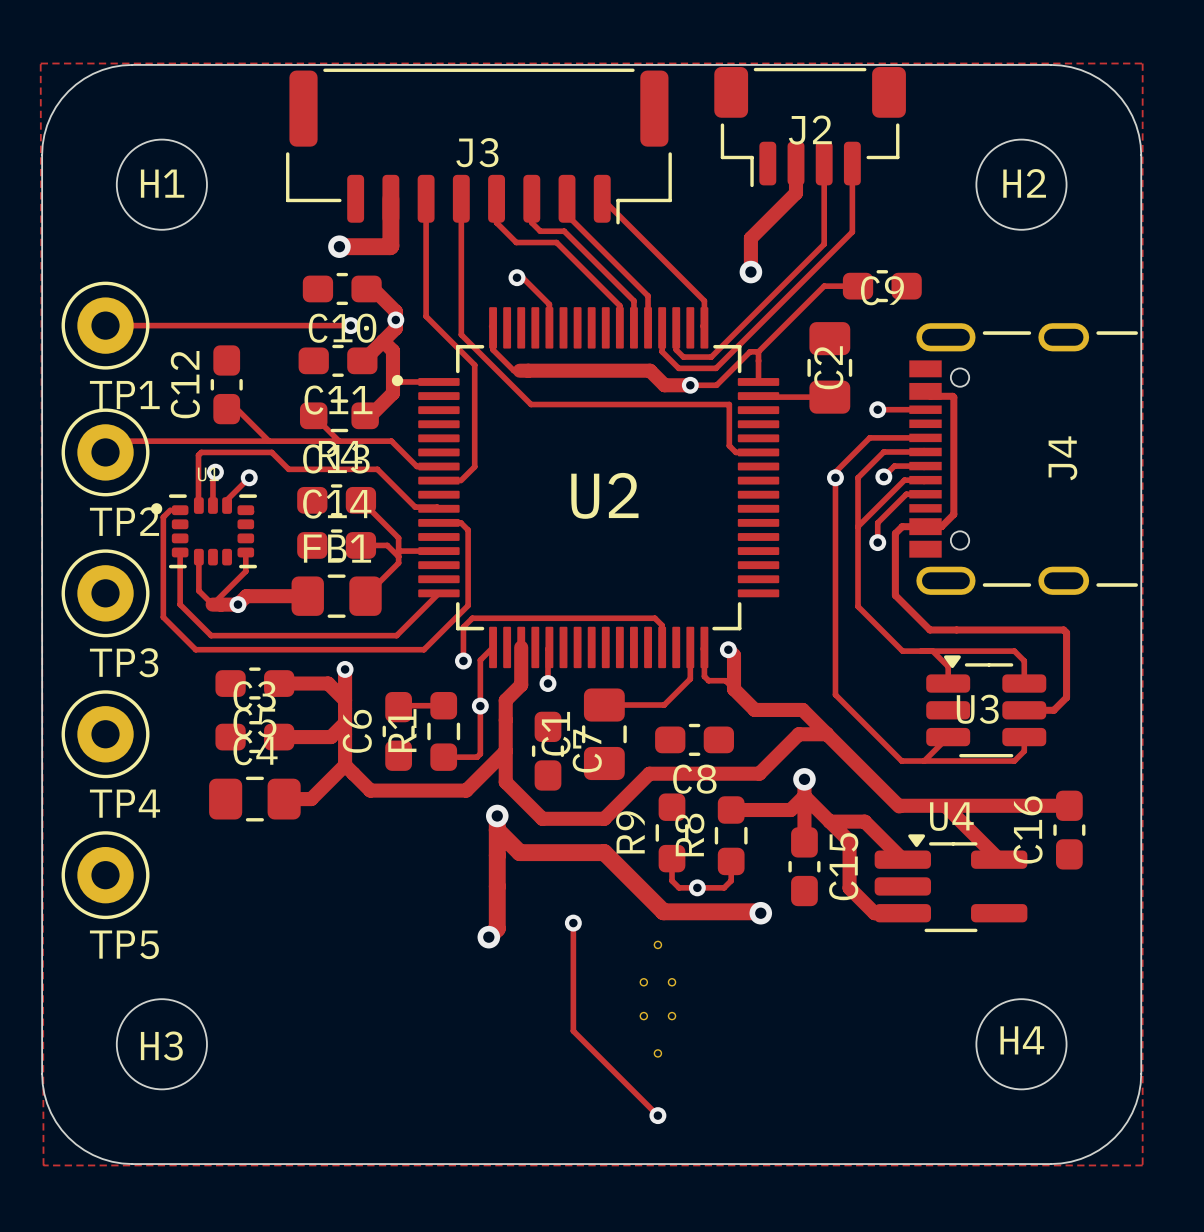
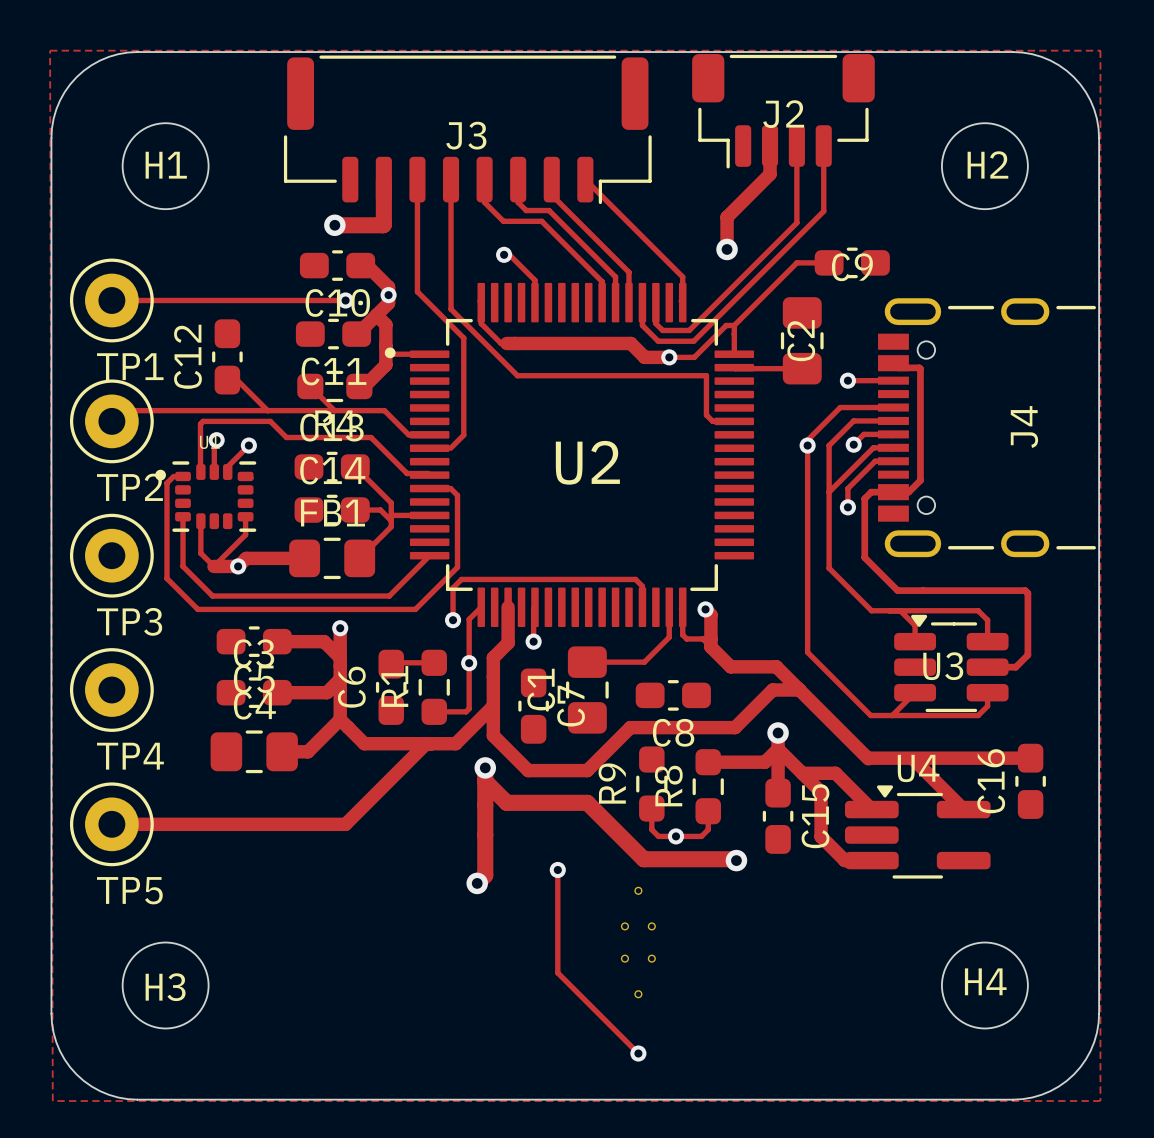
track: none -> (426, 743) (345, 824) (111, 824)

